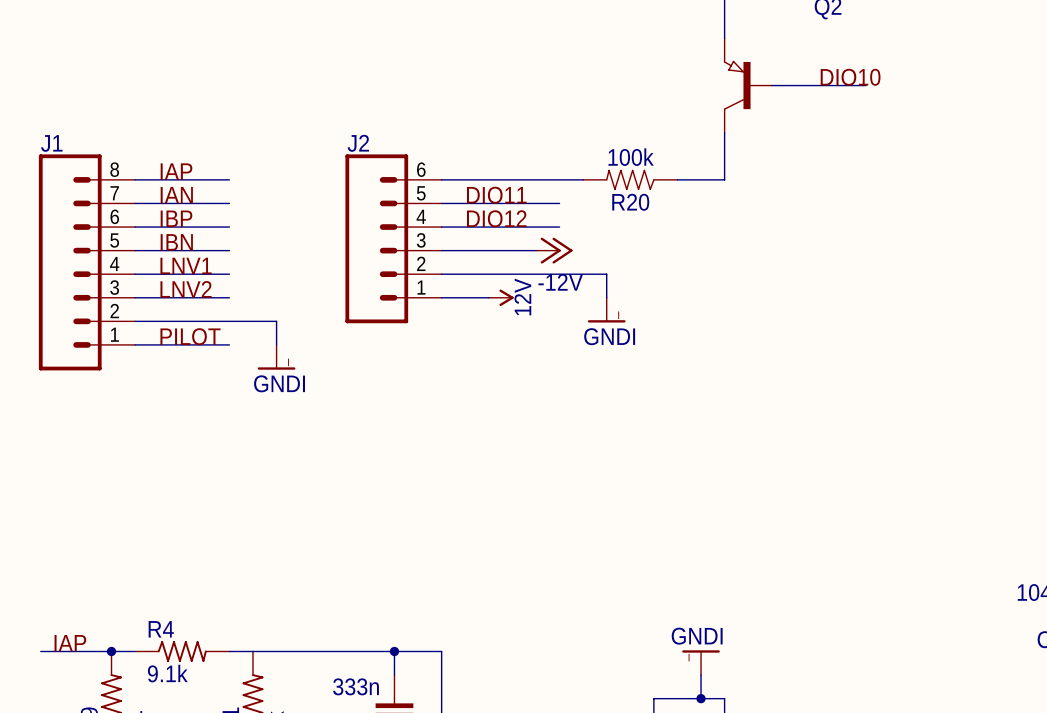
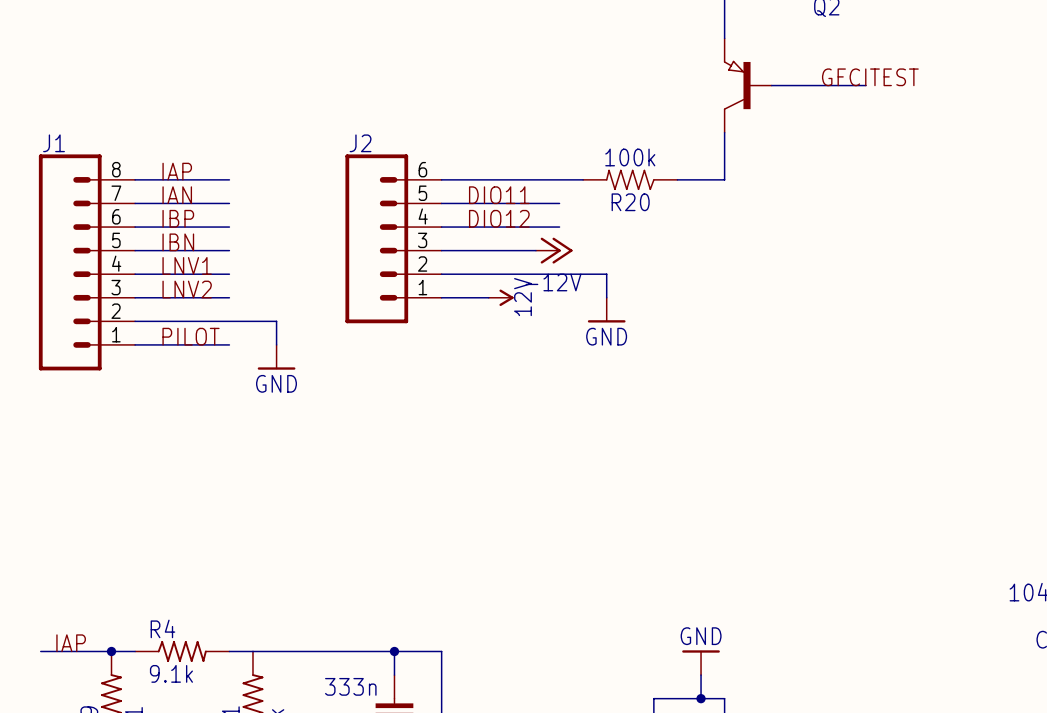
label: DIO10 (850, 77) -> GFCITEST (870, 77)
power symbol: GNDI (606, 310) -> GND (606, 310)
power symbol: GNDI (276, 357) -> GND (276, 357)
power symbol: GNDI (701, 662) -> GND (701, 662)

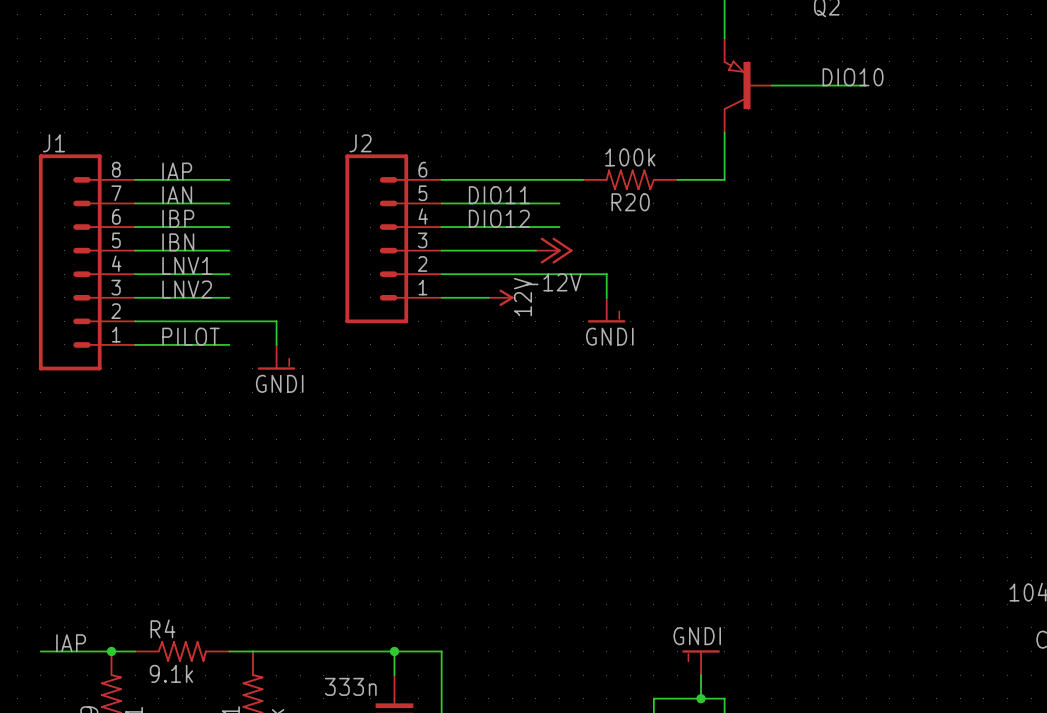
label: GFCITEST (870, 77) -> DIO10 (853, 77)
power symbol: GND (606, 310) -> GNDI (606, 310)
power symbol: GND (276, 357) -> GNDI (276, 357)
power symbol: GND (701, 662) -> GNDI (701, 662)

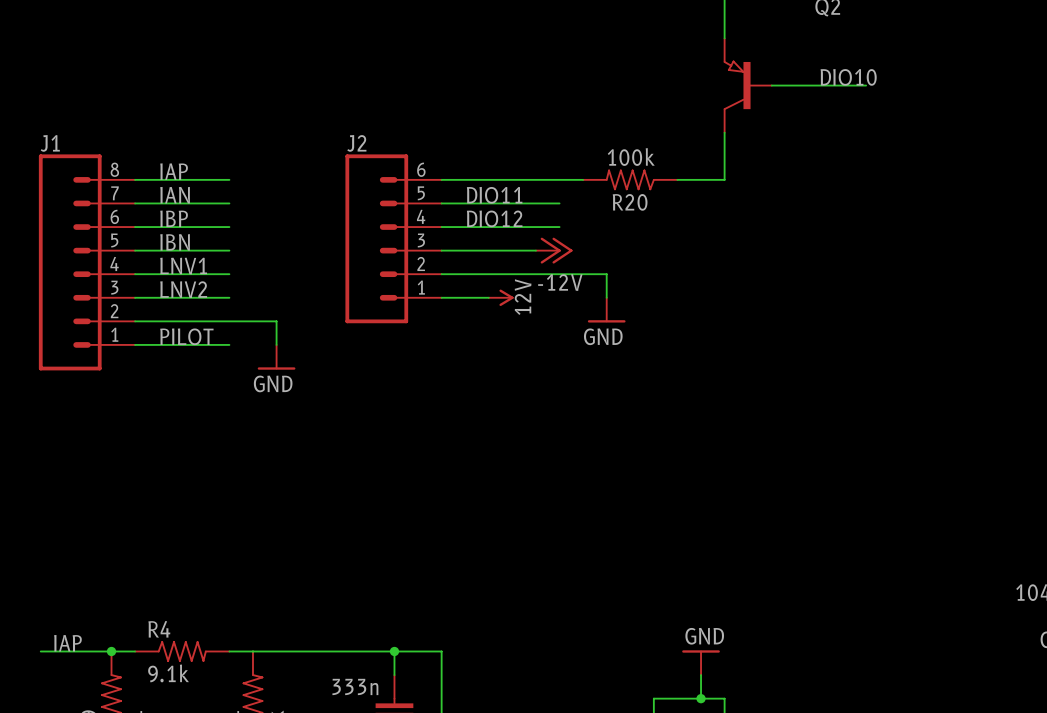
power symbol: GNDI (606, 310) -> GND (606, 310)
power symbol: GNDI (276, 357) -> GND (276, 357)
power symbol: GNDI (701, 662) -> GND (701, 662)

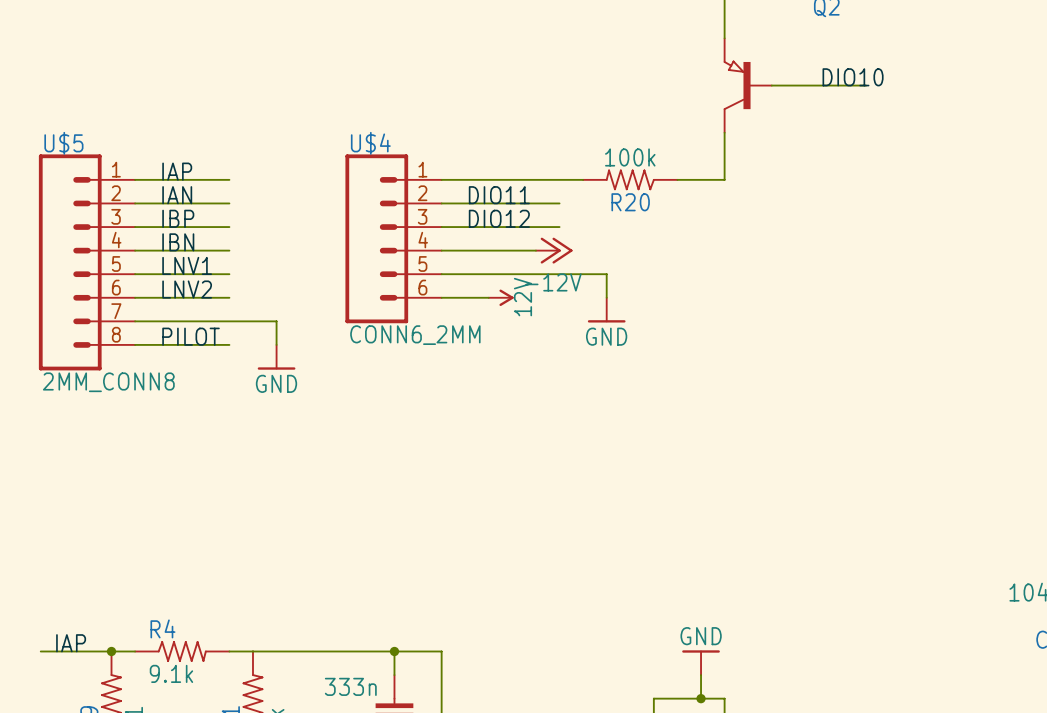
J1 name: J1 (50, 143) -> U$5 (63, 143)
J2 name: J2 (356, 143) -> U$4 (370, 143)
J2 flip: as is (376, 238) -> up-down (376, 238)
J1 flip: as is (70, 262) -> up-down (70, 262)
J2 value: none -> CONN6_2MM (415, 335)
J1 value: none -> 2MM_CONN8 (108, 382)

